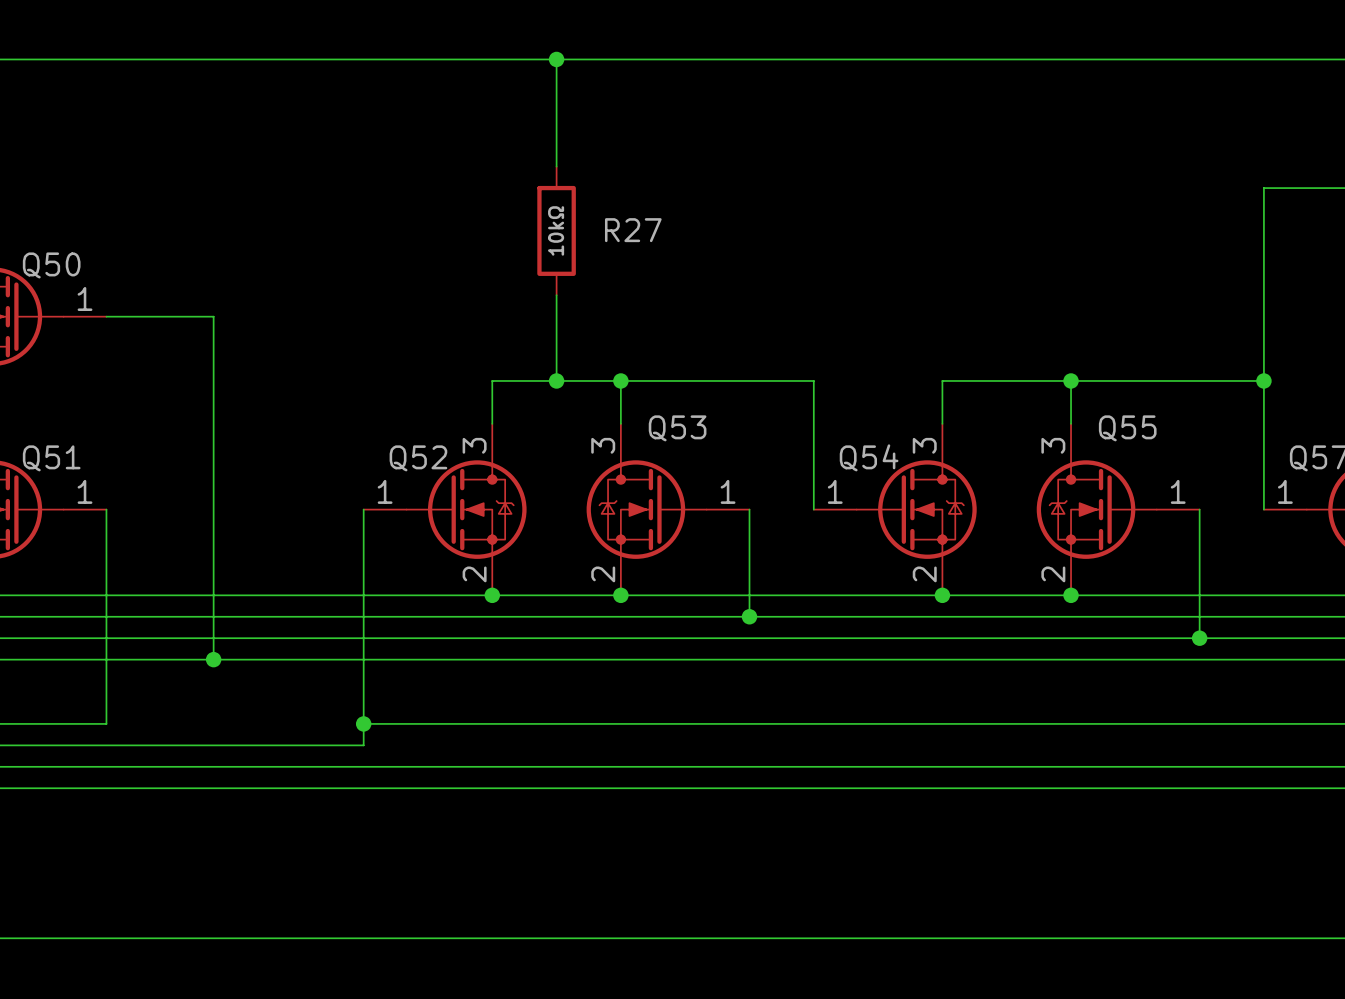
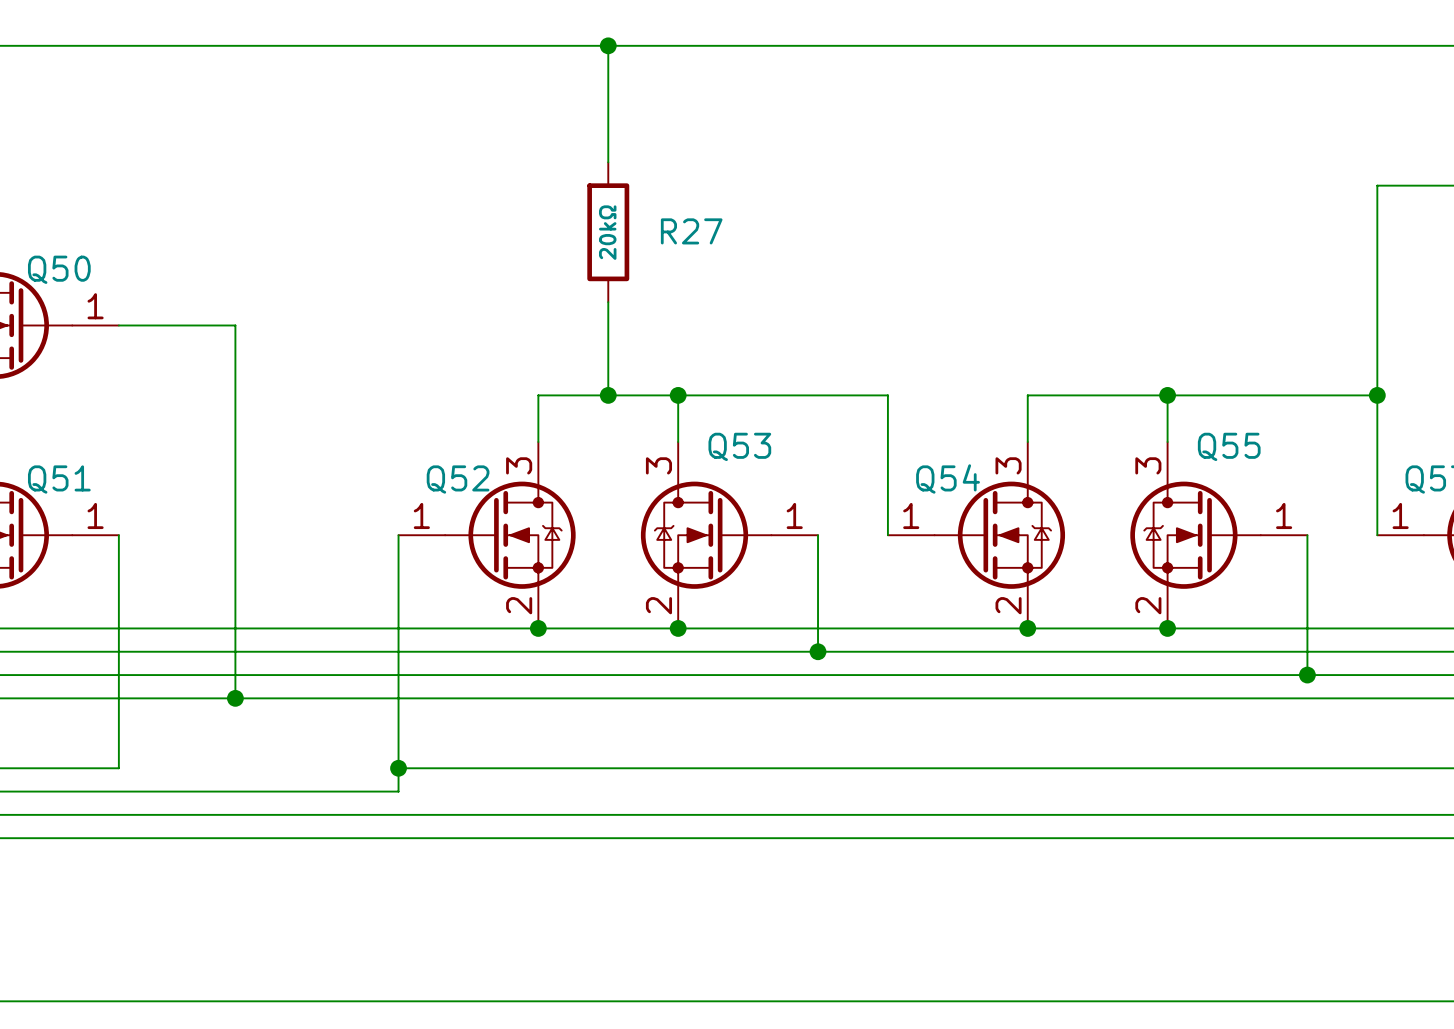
R27 value: 10kΩ (556, 230) -> 20kΩ (607, 232)

